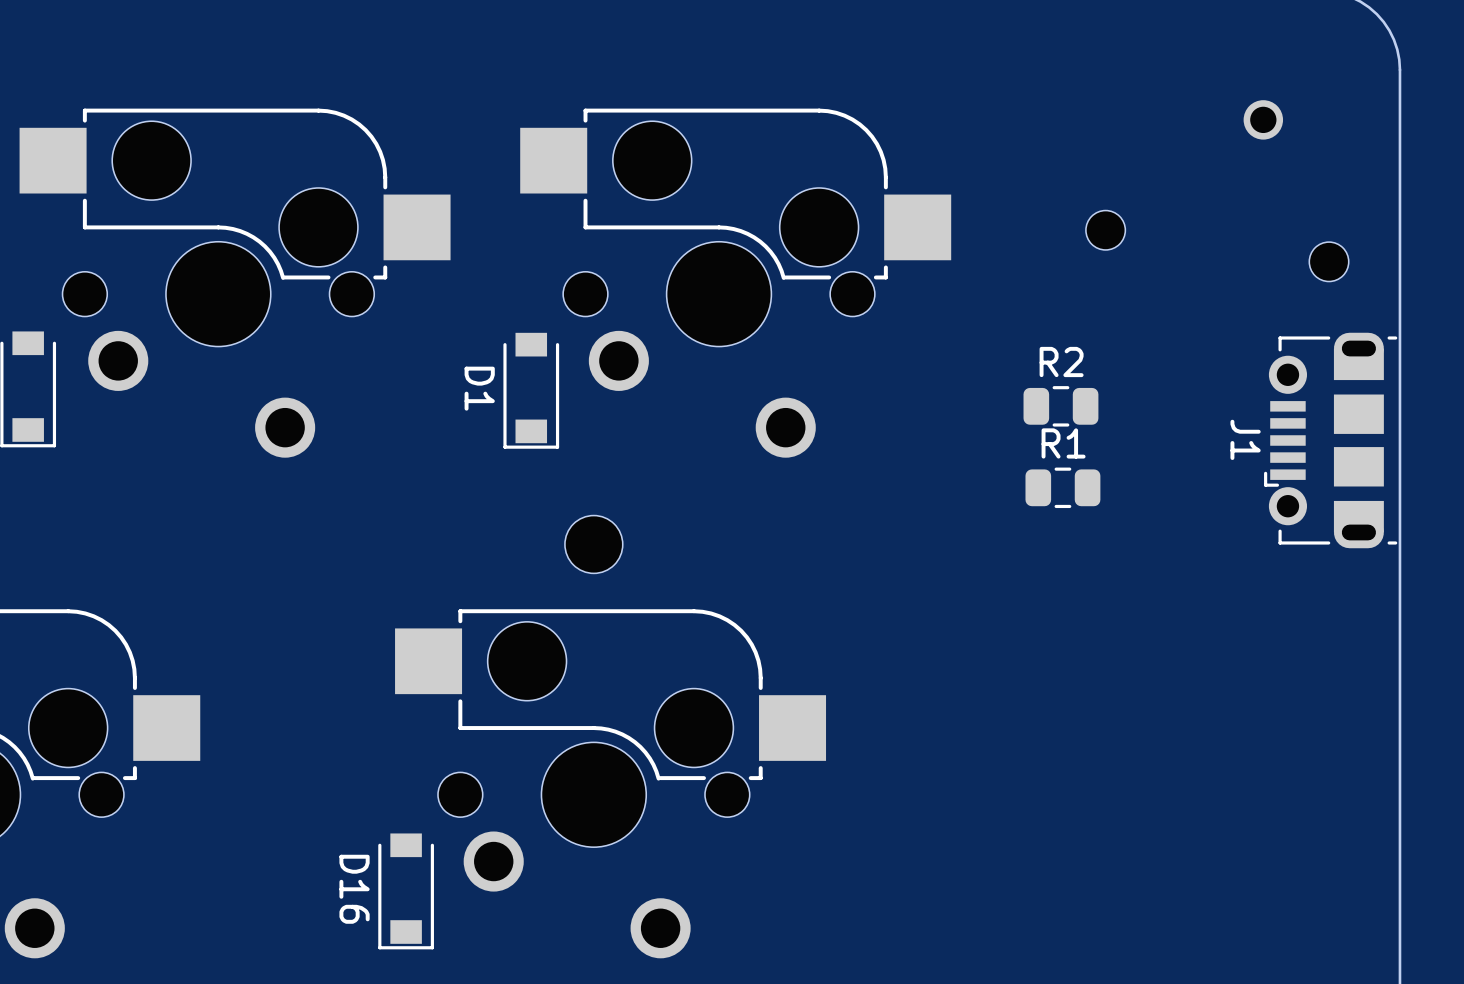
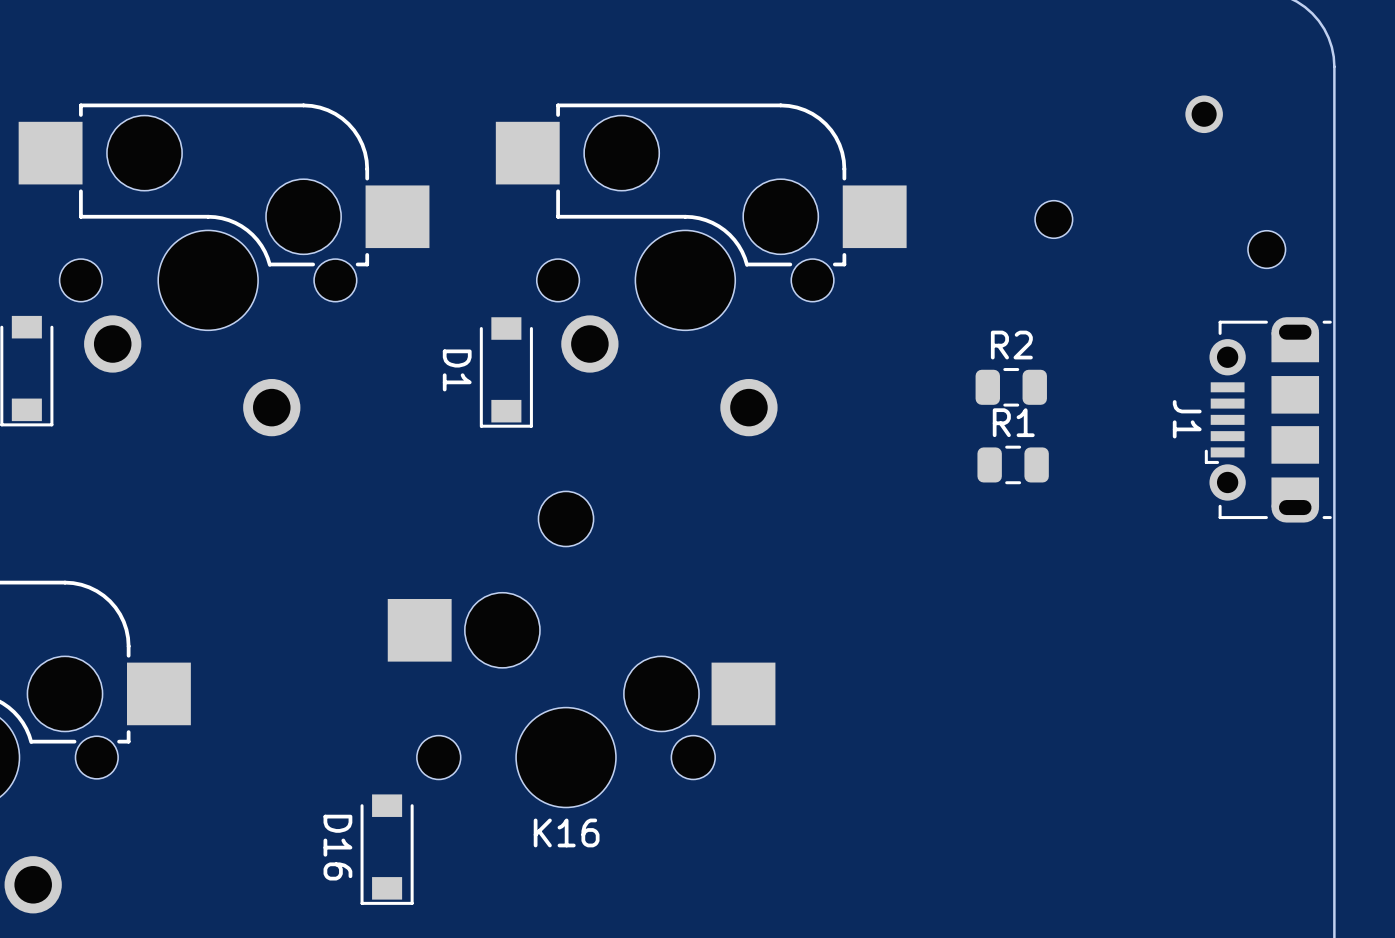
K16: none -> (581, 700)
part: (610, 783) -> none

